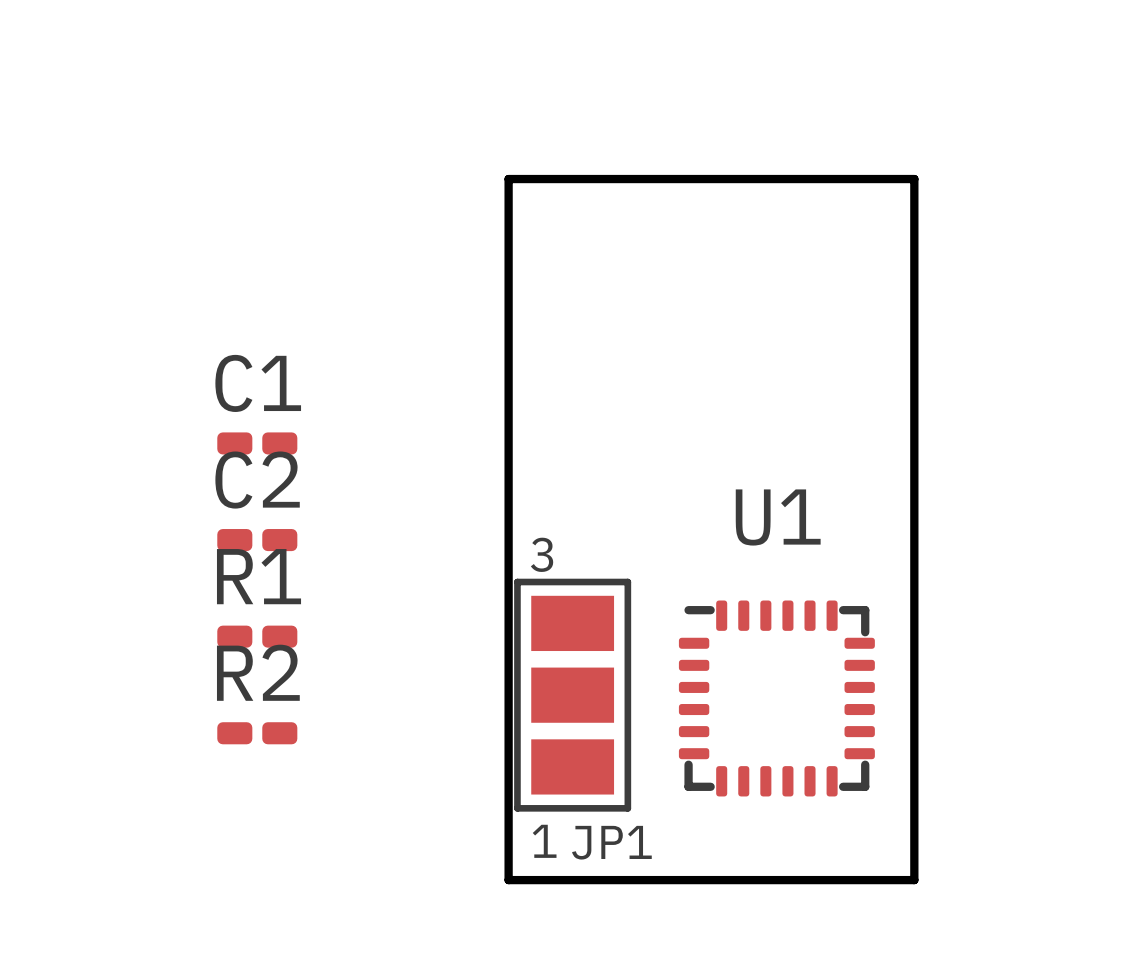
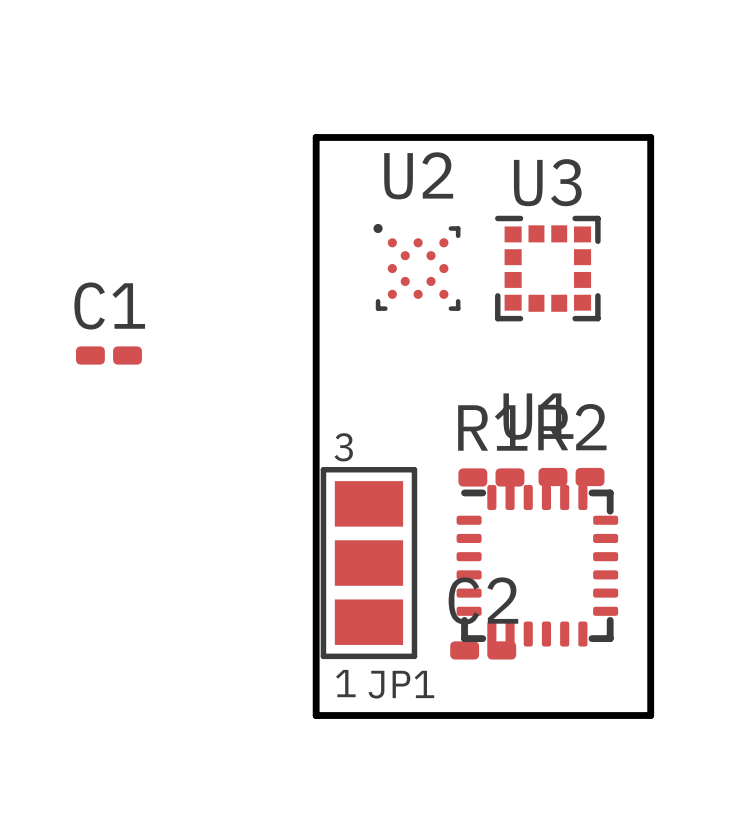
U2: none -> (416, 267)
U3: none -> (547, 268)
C2 position: (257, 540) -> (483, 650)
R1 position: (257, 636) -> (491, 477)
R2 position: (257, 733) -> (571, 477)

